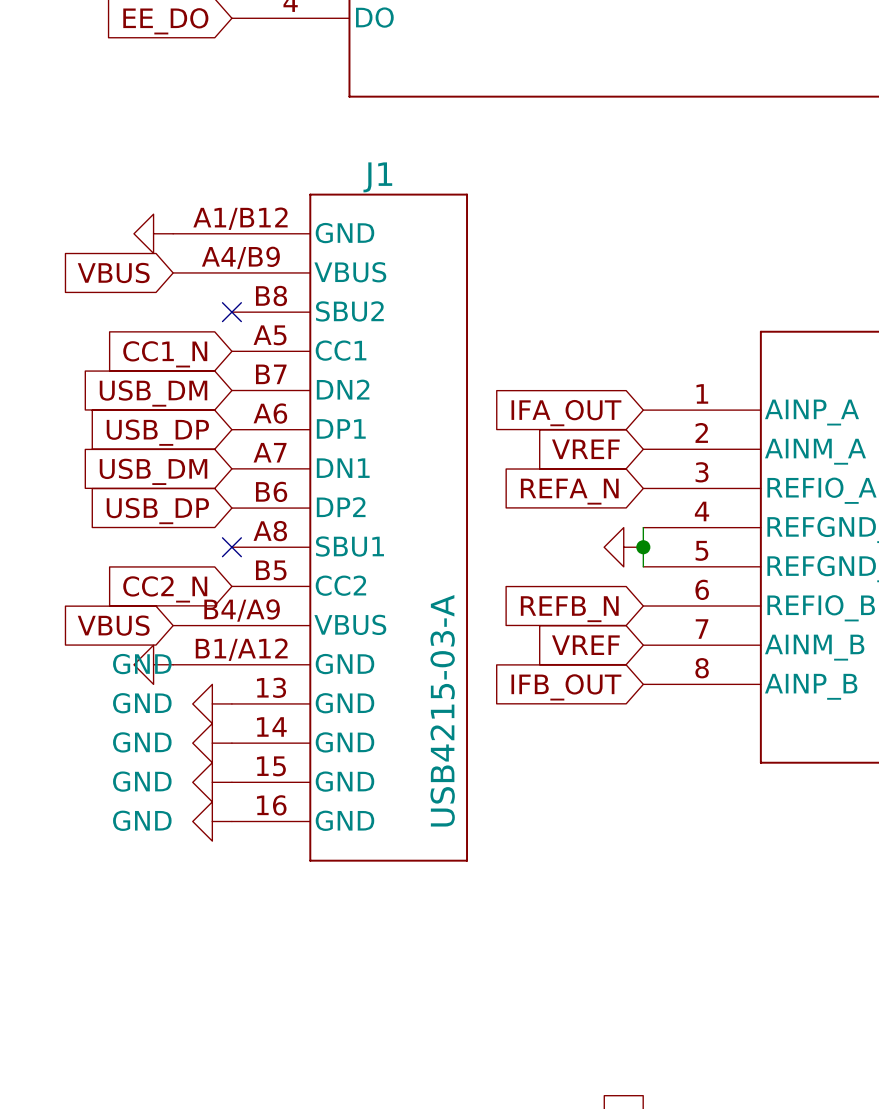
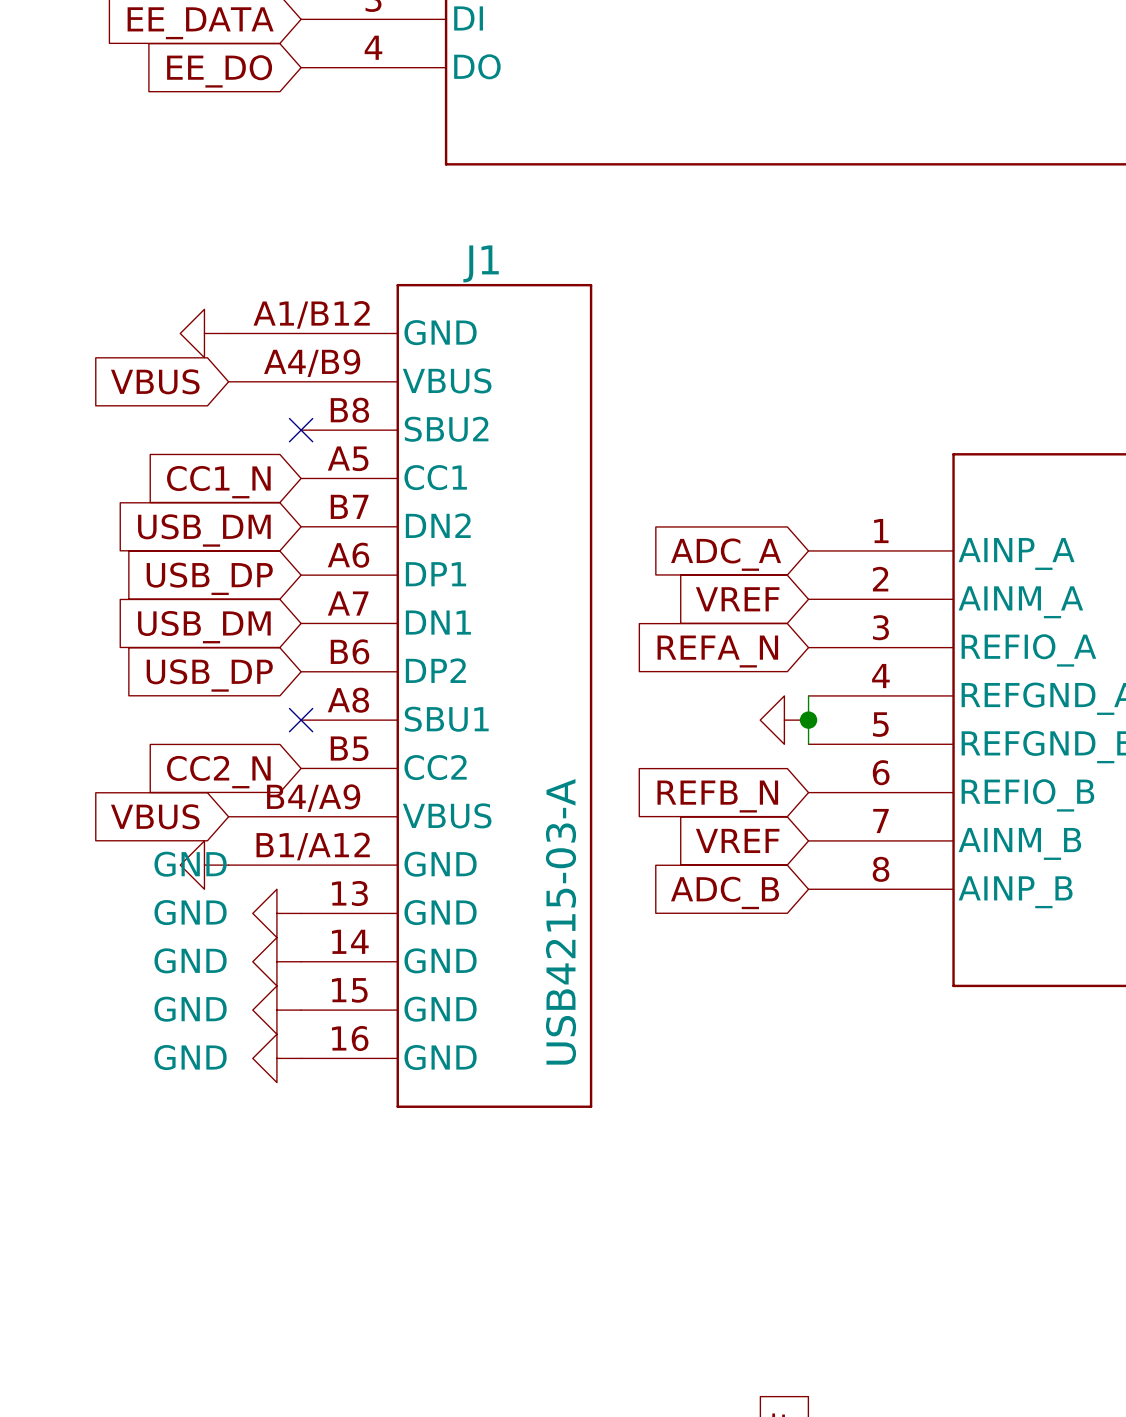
global label: IFA_OUT (566, 413) -> ADC_A (726, 554)
global label: IFB_OUT (566, 687) -> ADC_B (725, 892)

